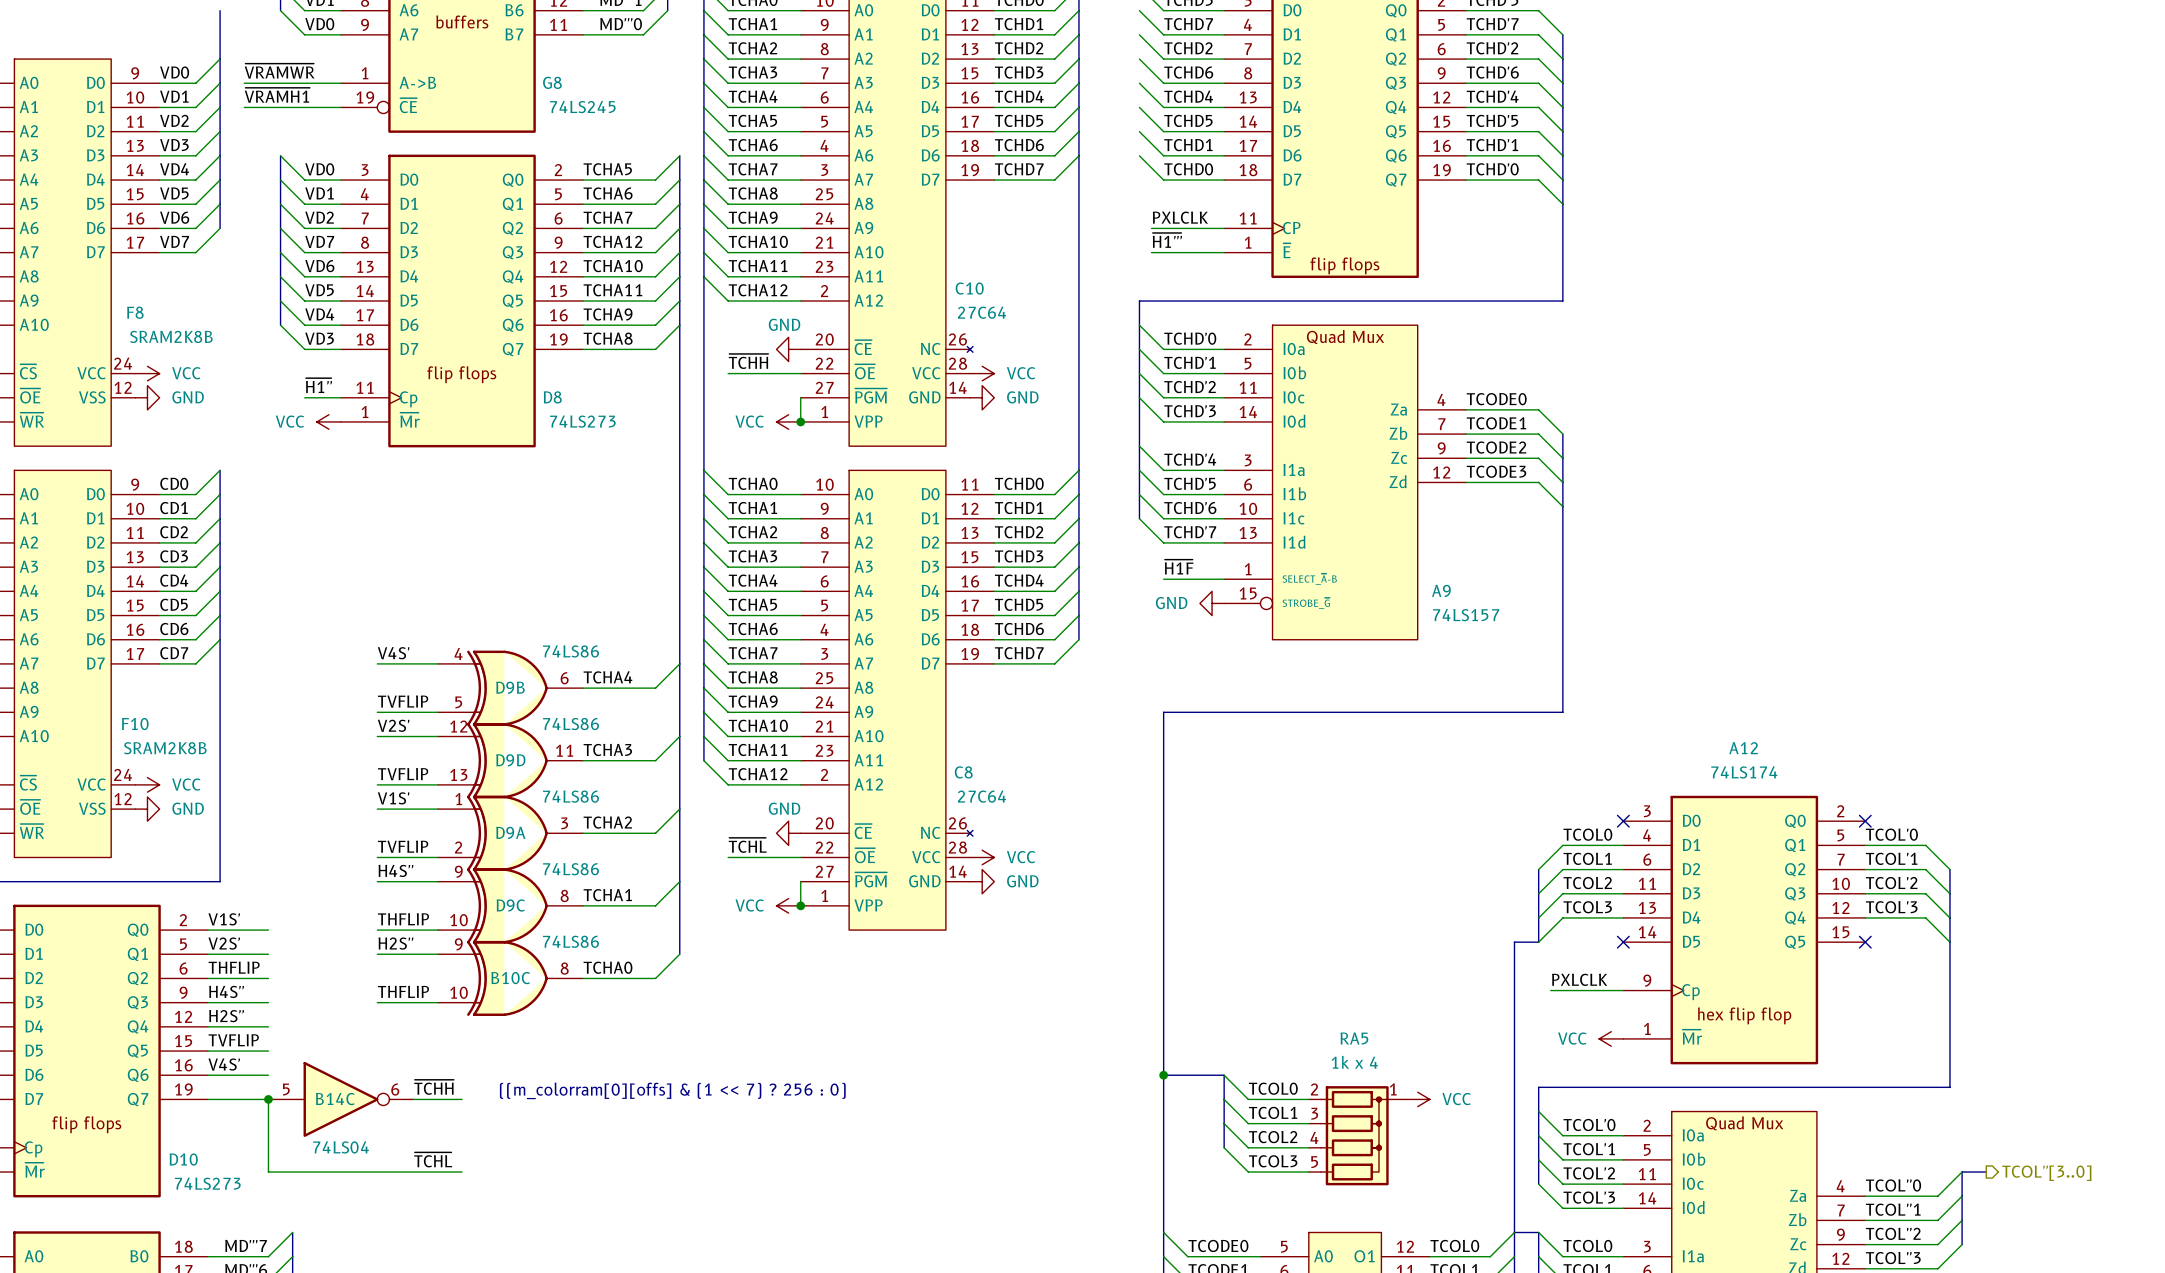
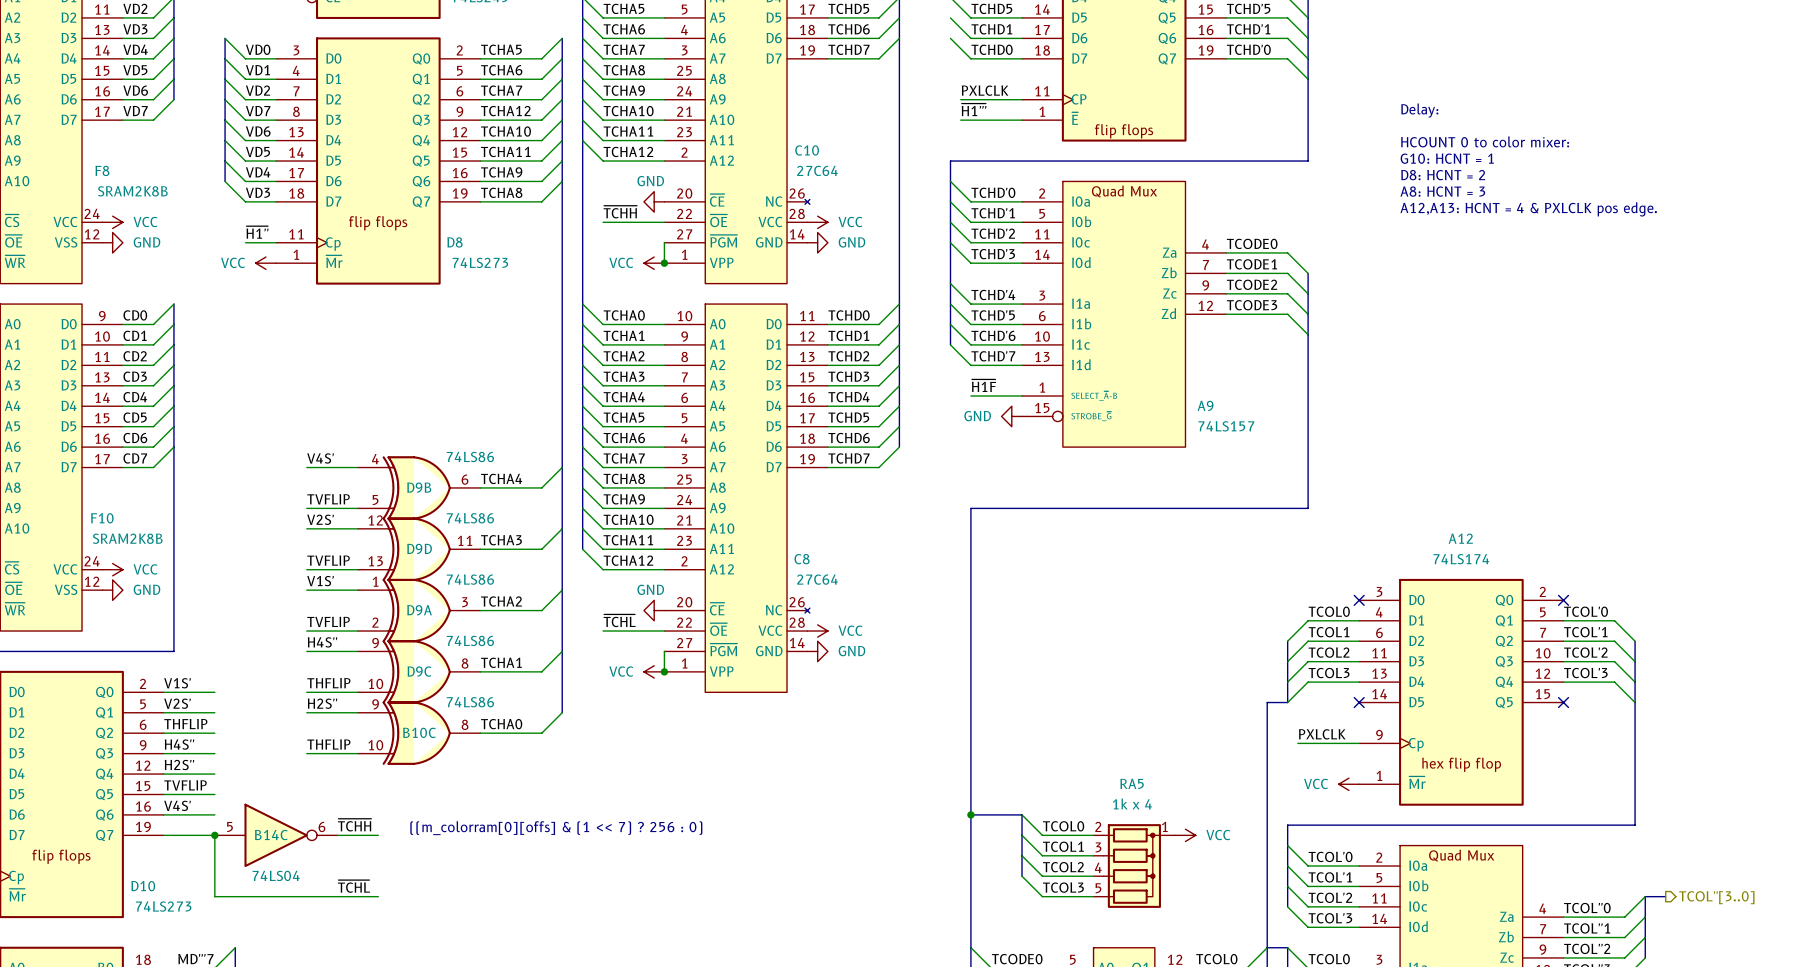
text: none -> Delay: (1419, 110)
text: none -> HCOUNT 0 to color mixer: (1485, 141)
text: none -> G10: HCNT = 1 (1447, 158)
text: none -> D8: HCNT = 2 (1443, 175)
text: none -> A8: HCNT = 3 (1442, 191)
text: none -> A12,A13: HCNT = 4 & PXLCLK pos edge. (1528, 209)

